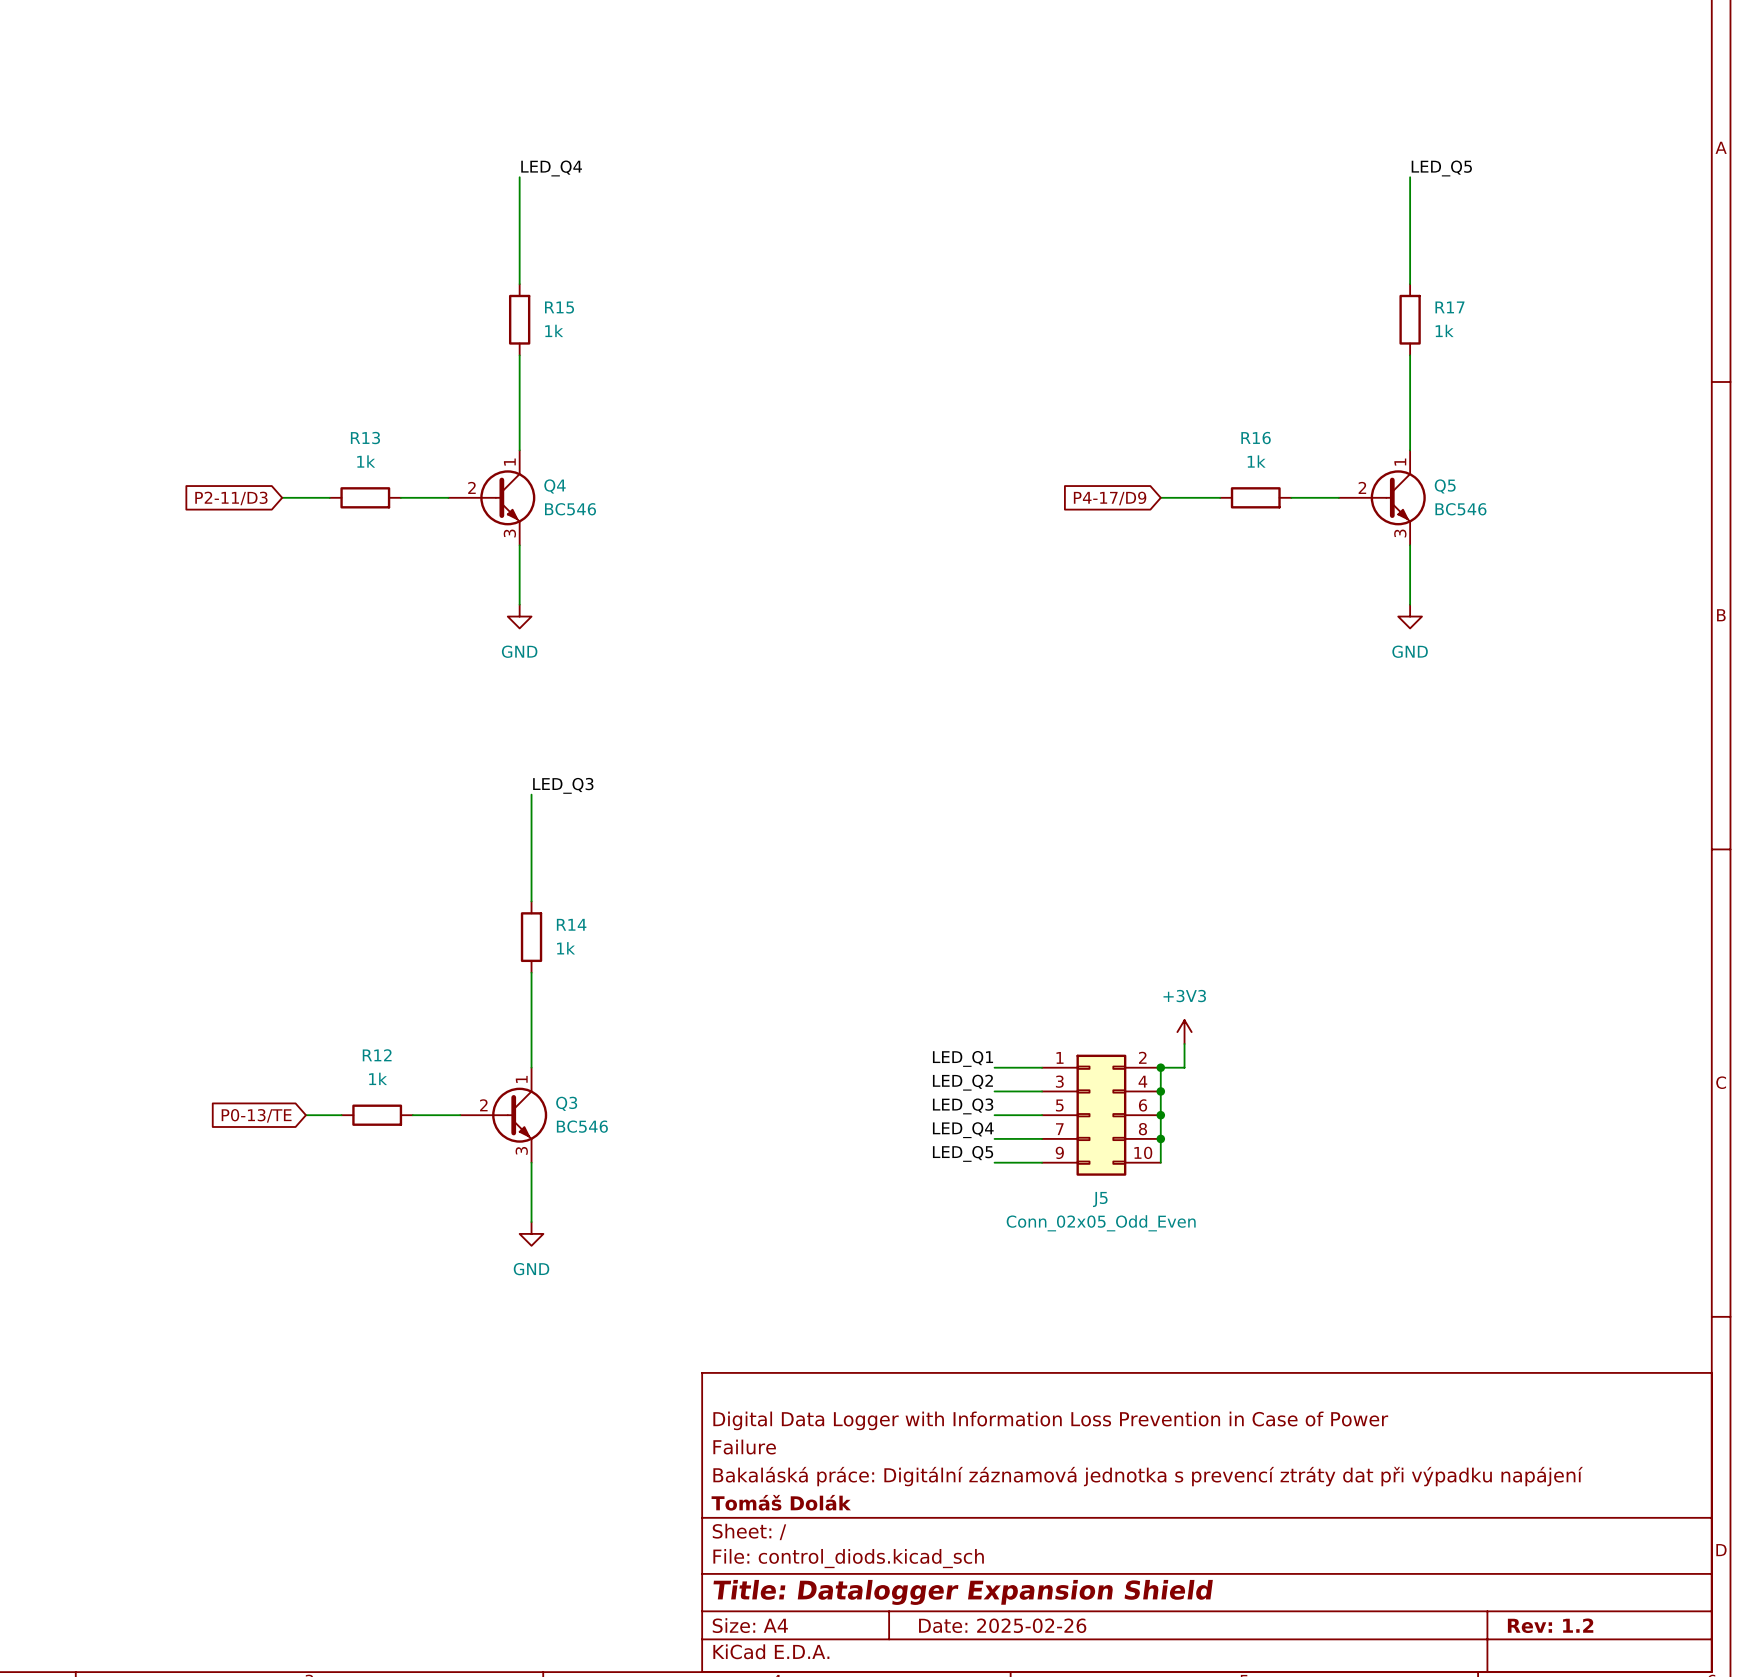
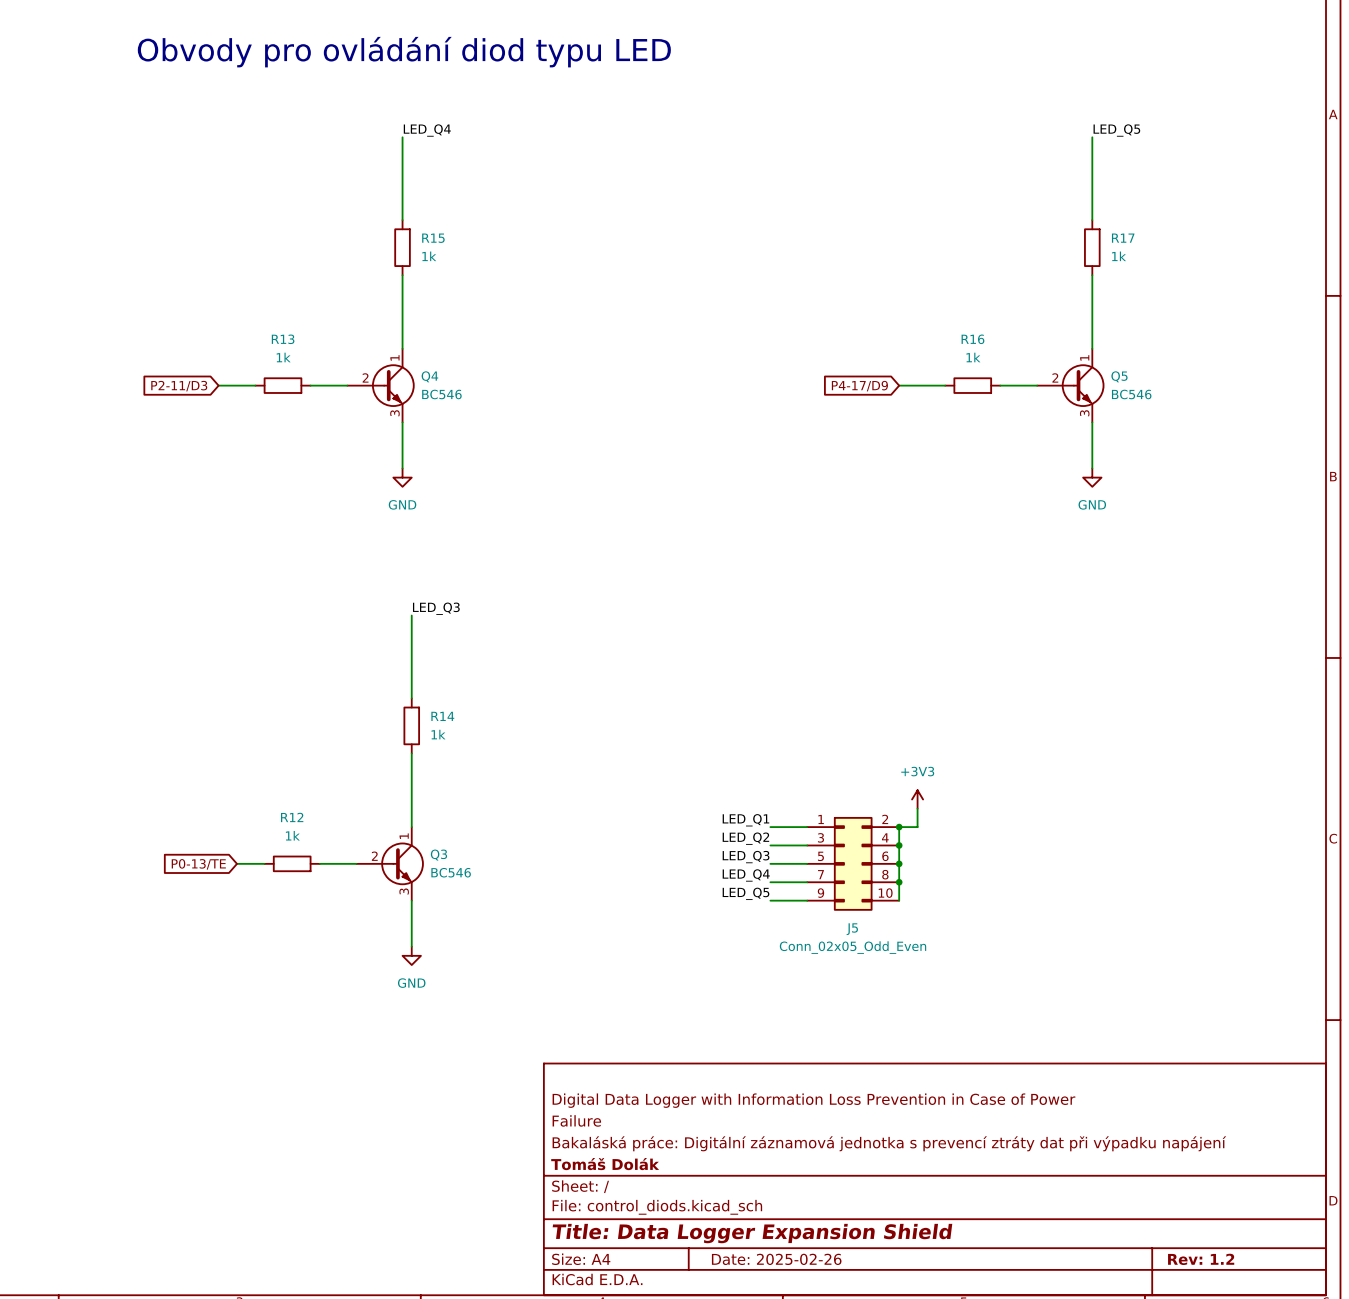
text: none -> Obvody pro ovládání diod typu LED (404, 52)
title block: Title: Datalogger Expansion Shield (963, 1592) -> Title: Data Logger Expansion Shield (752, 1233)

